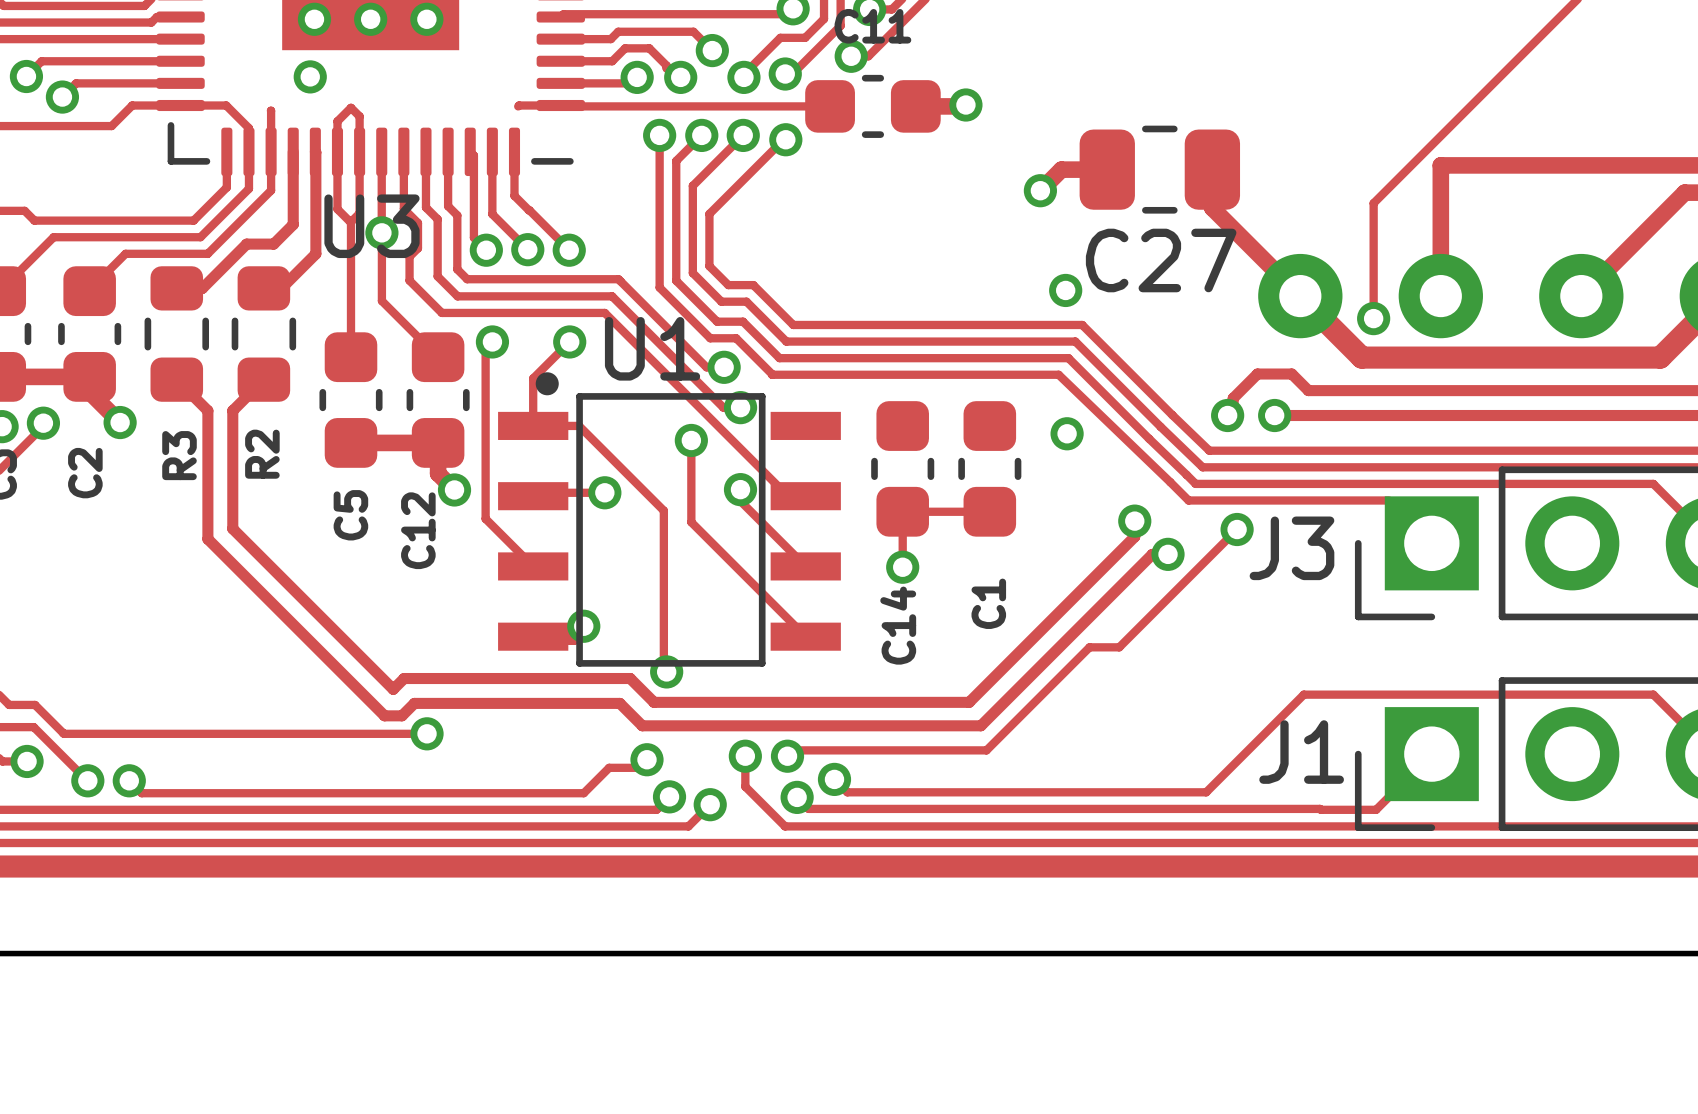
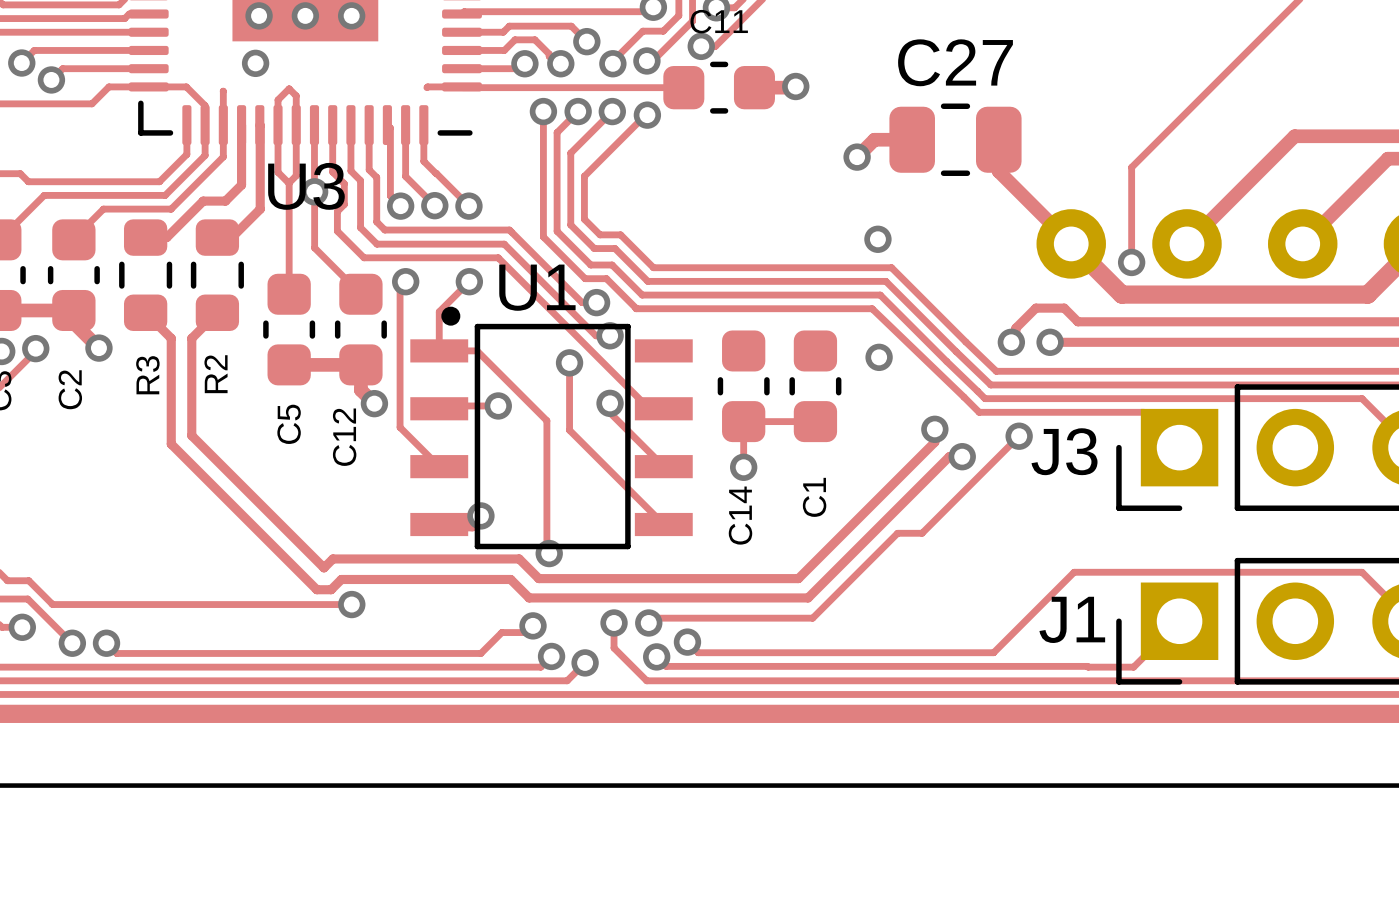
track: (1571, 165) (1440, 165) (1440, 298) -> (1294, 136) (1186, 243)
C27 name position: C27 (1161, 260) -> C27 (955, 62)

